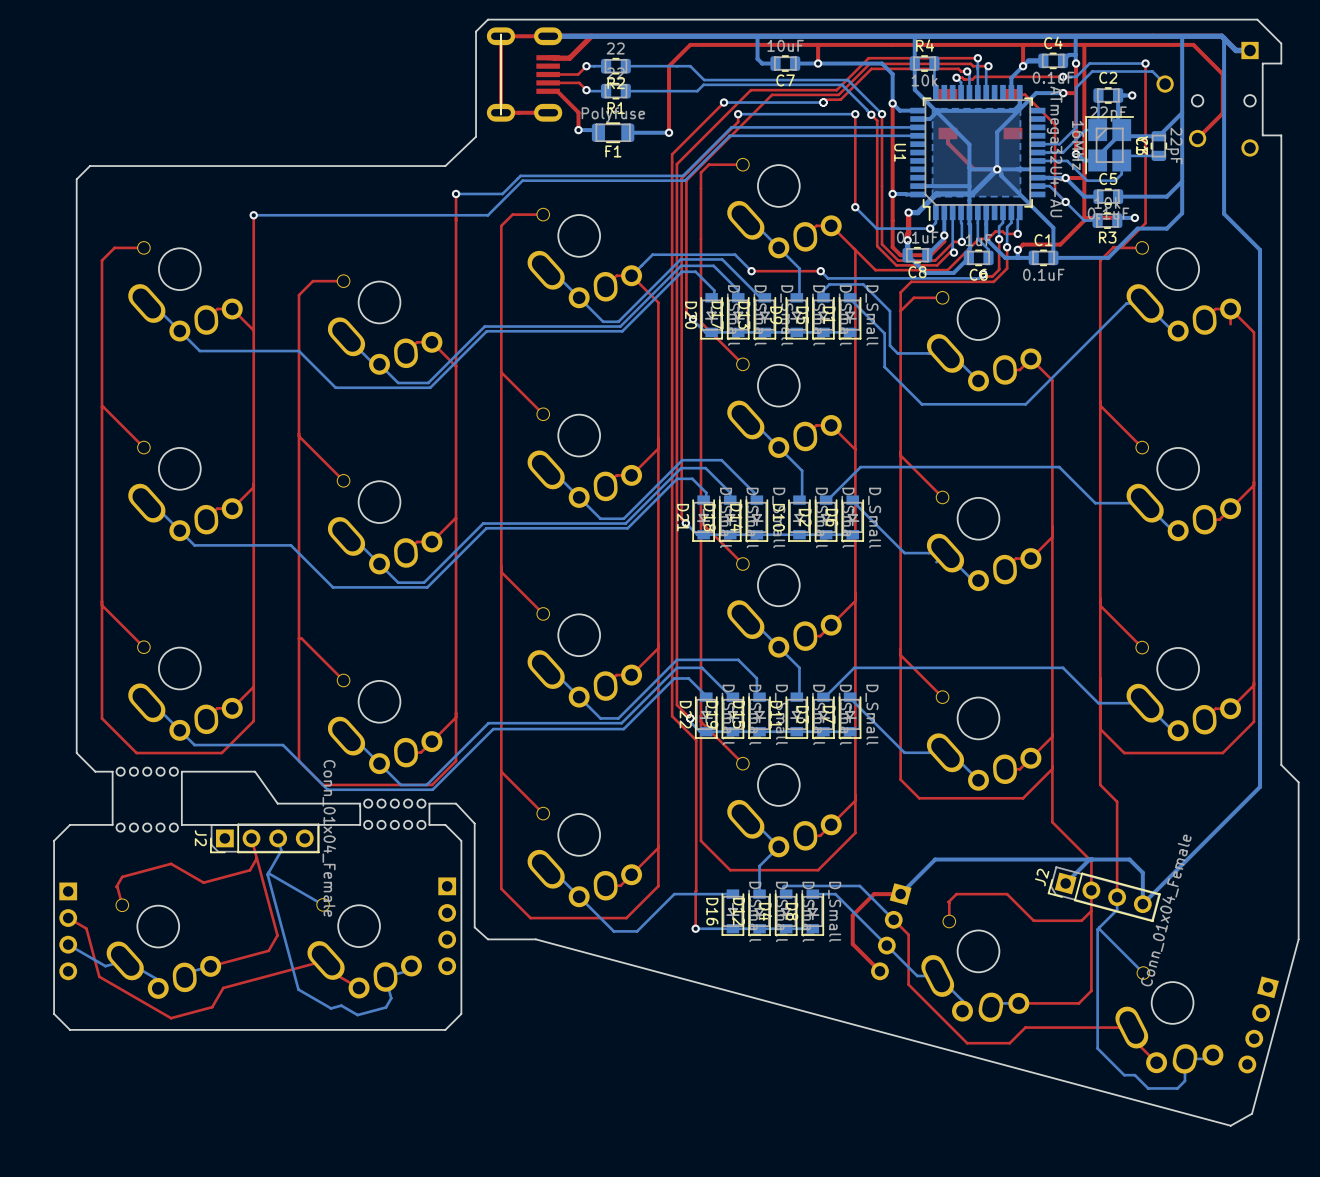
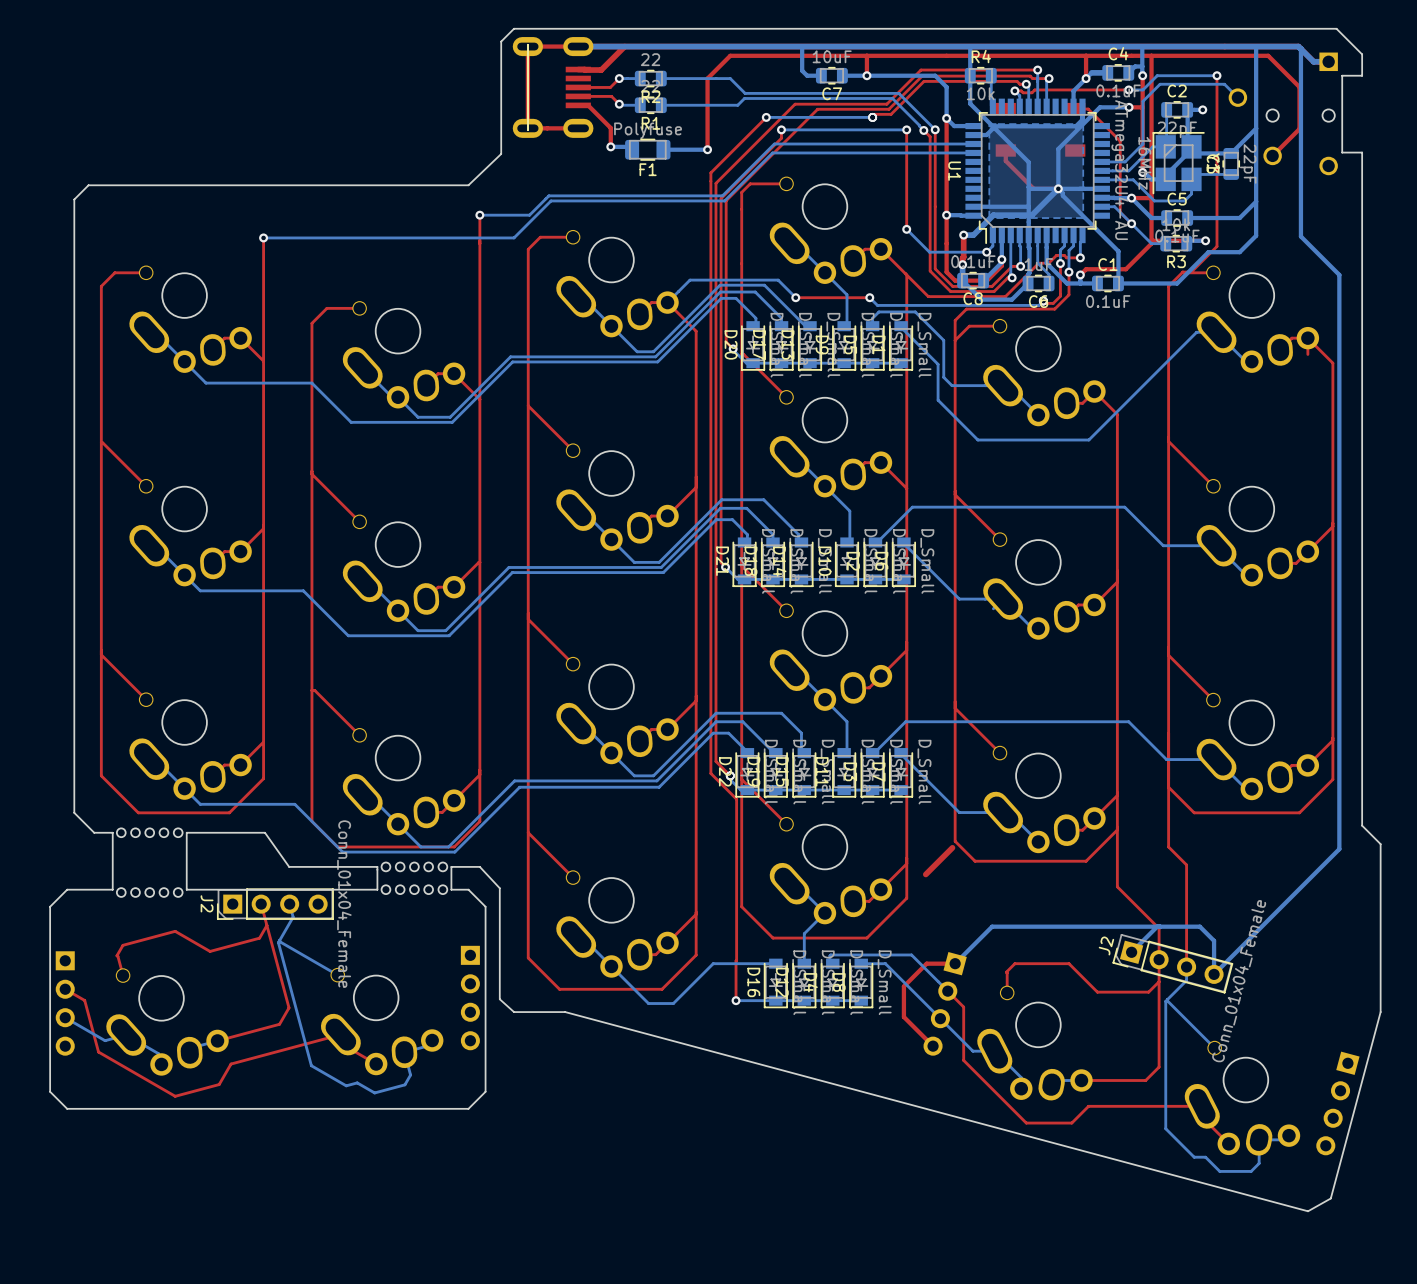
top track: none -> (952, 847) (925, 874)

